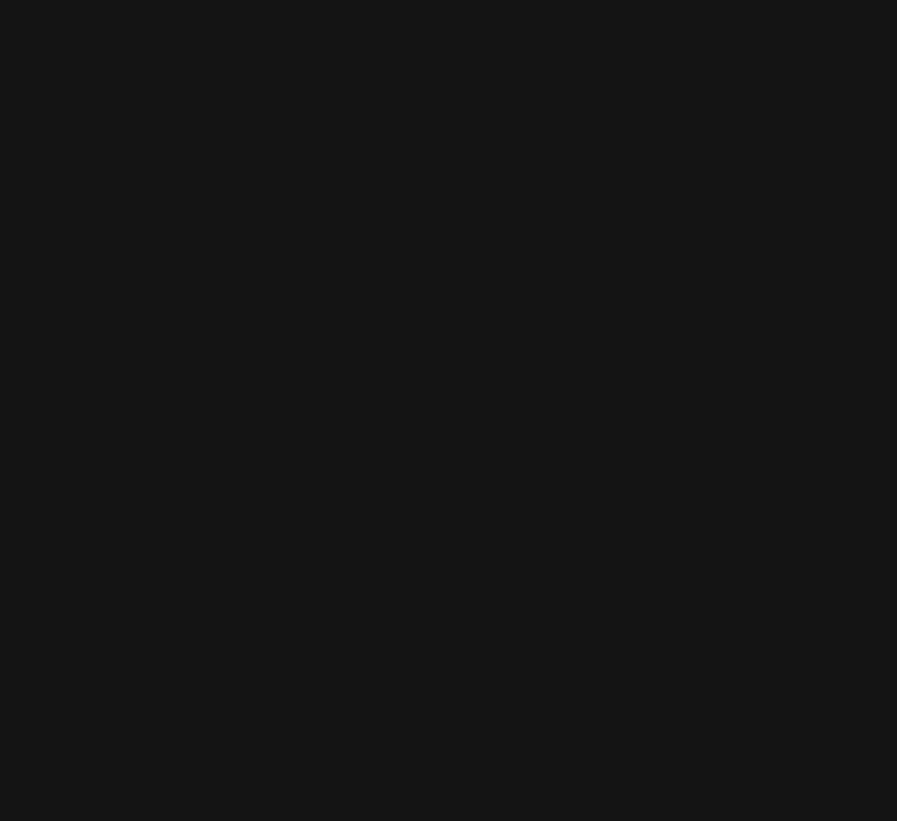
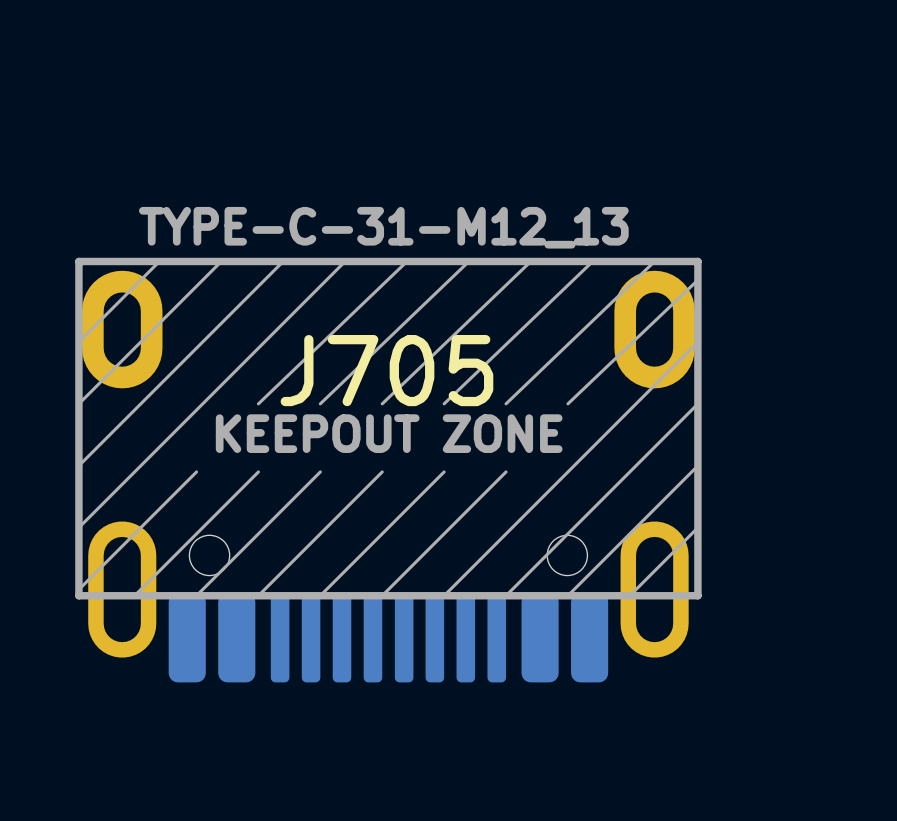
J705: none -> TYPE-C-31-M12_13 (388, 470)

